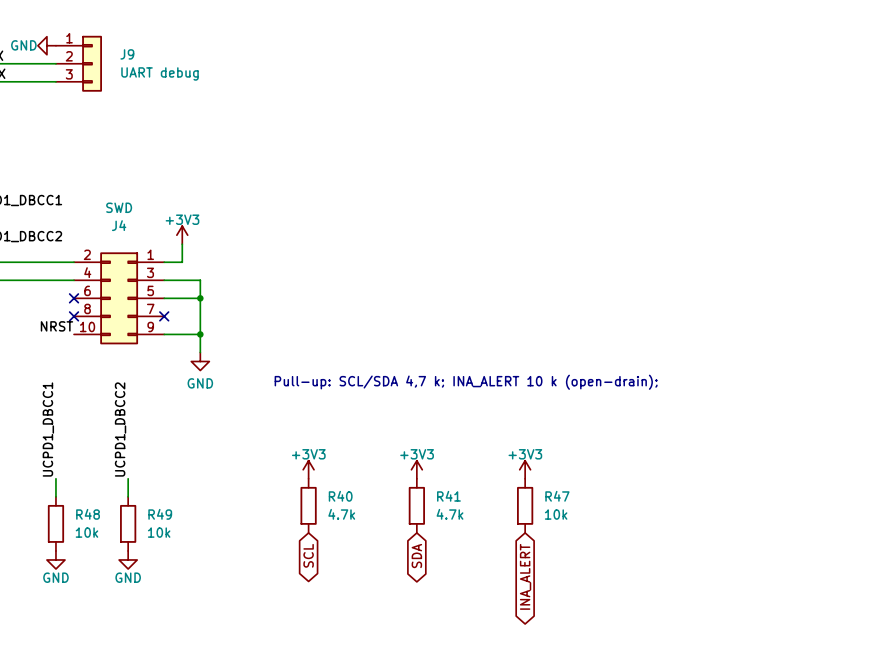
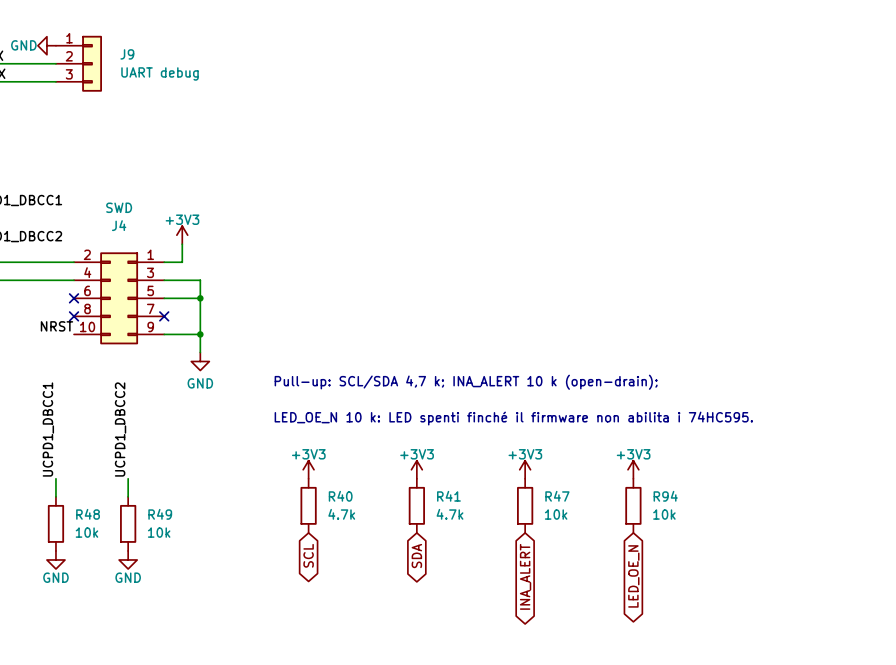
text: none -> LED_OE_N 10 k: LED spenti finché il firmware non abilita i 74HC595. (513, 418)
power symbol: none -> +3V3 (633, 469)
R94: none -> 10k (633, 505)
global label: none -> LED_OE_N (633, 576)

